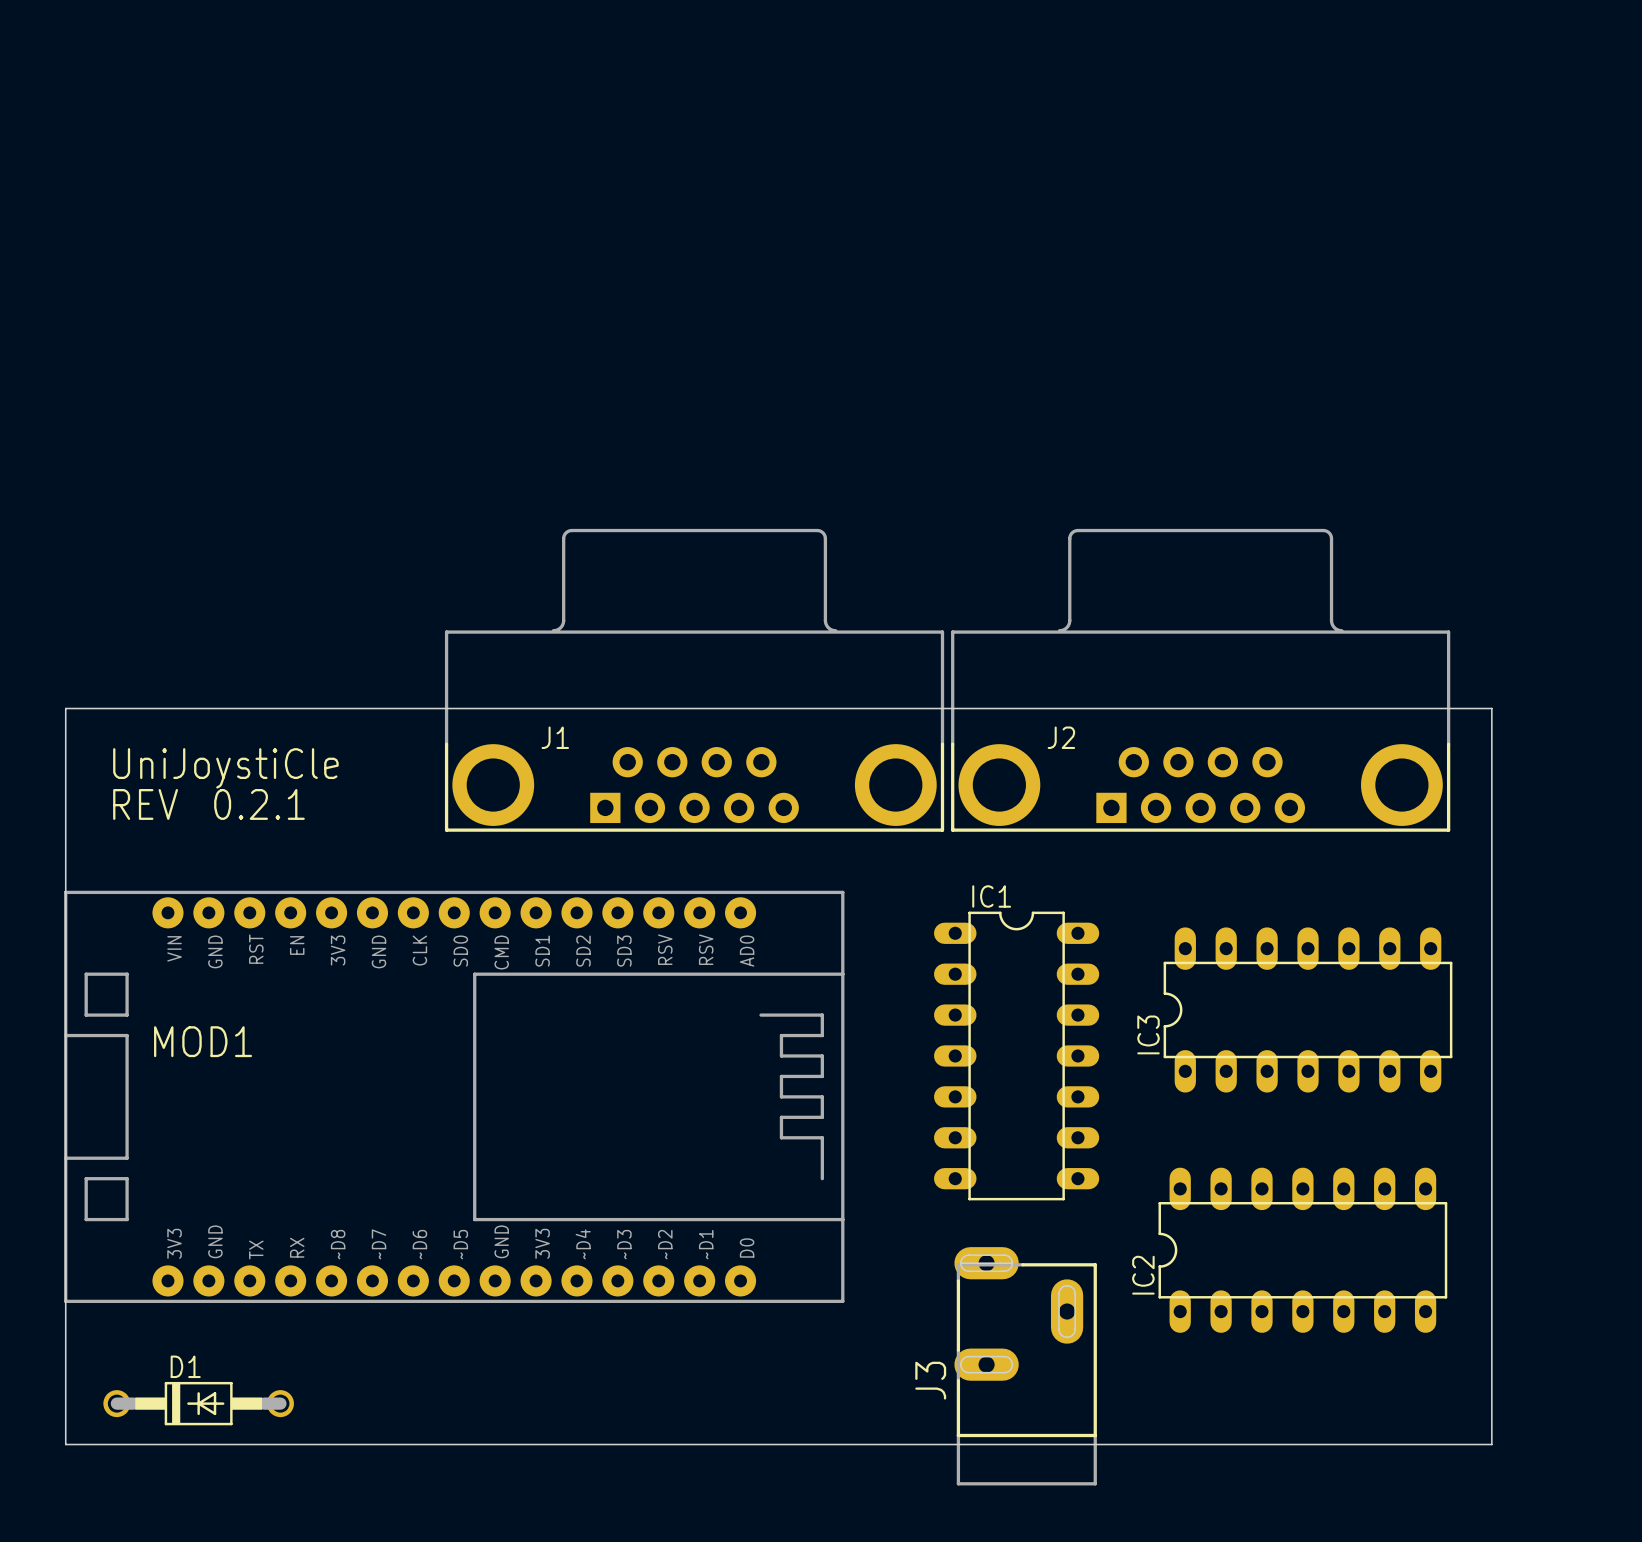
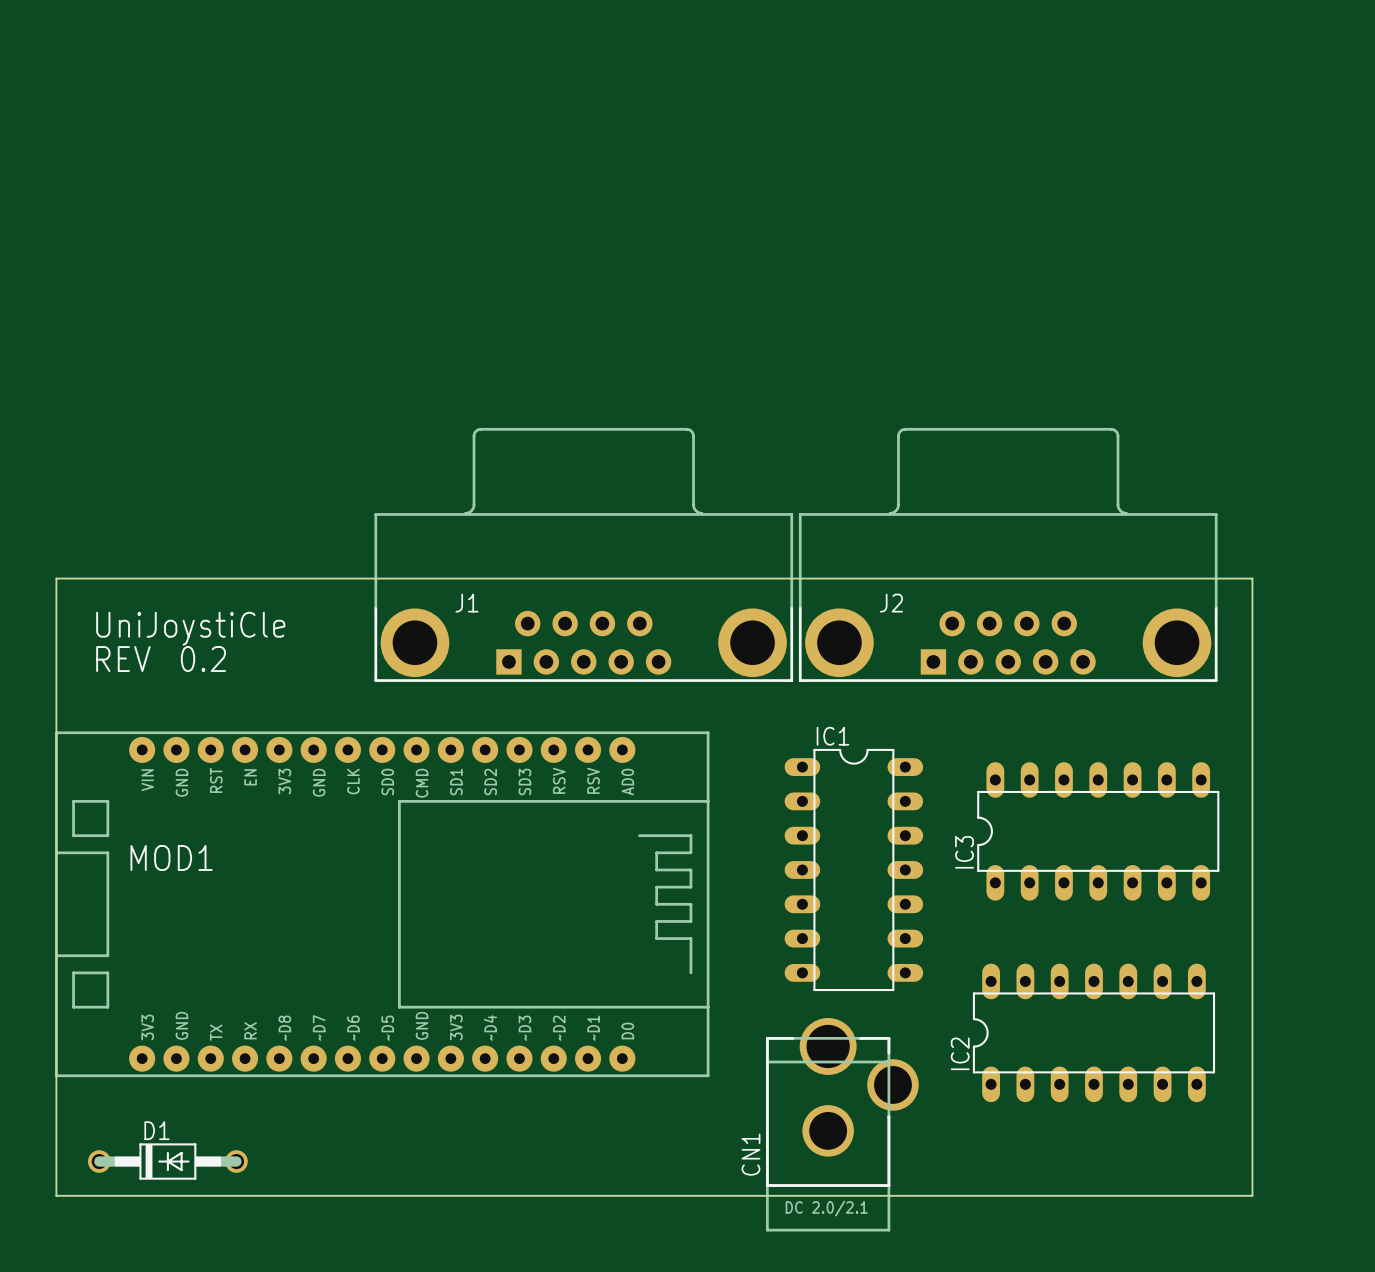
text: 0.2.1 (259, 804) -> 0.2 (203, 659)
CN1: none -> (842, 1124)
J3: (1025, 1366) -> none

